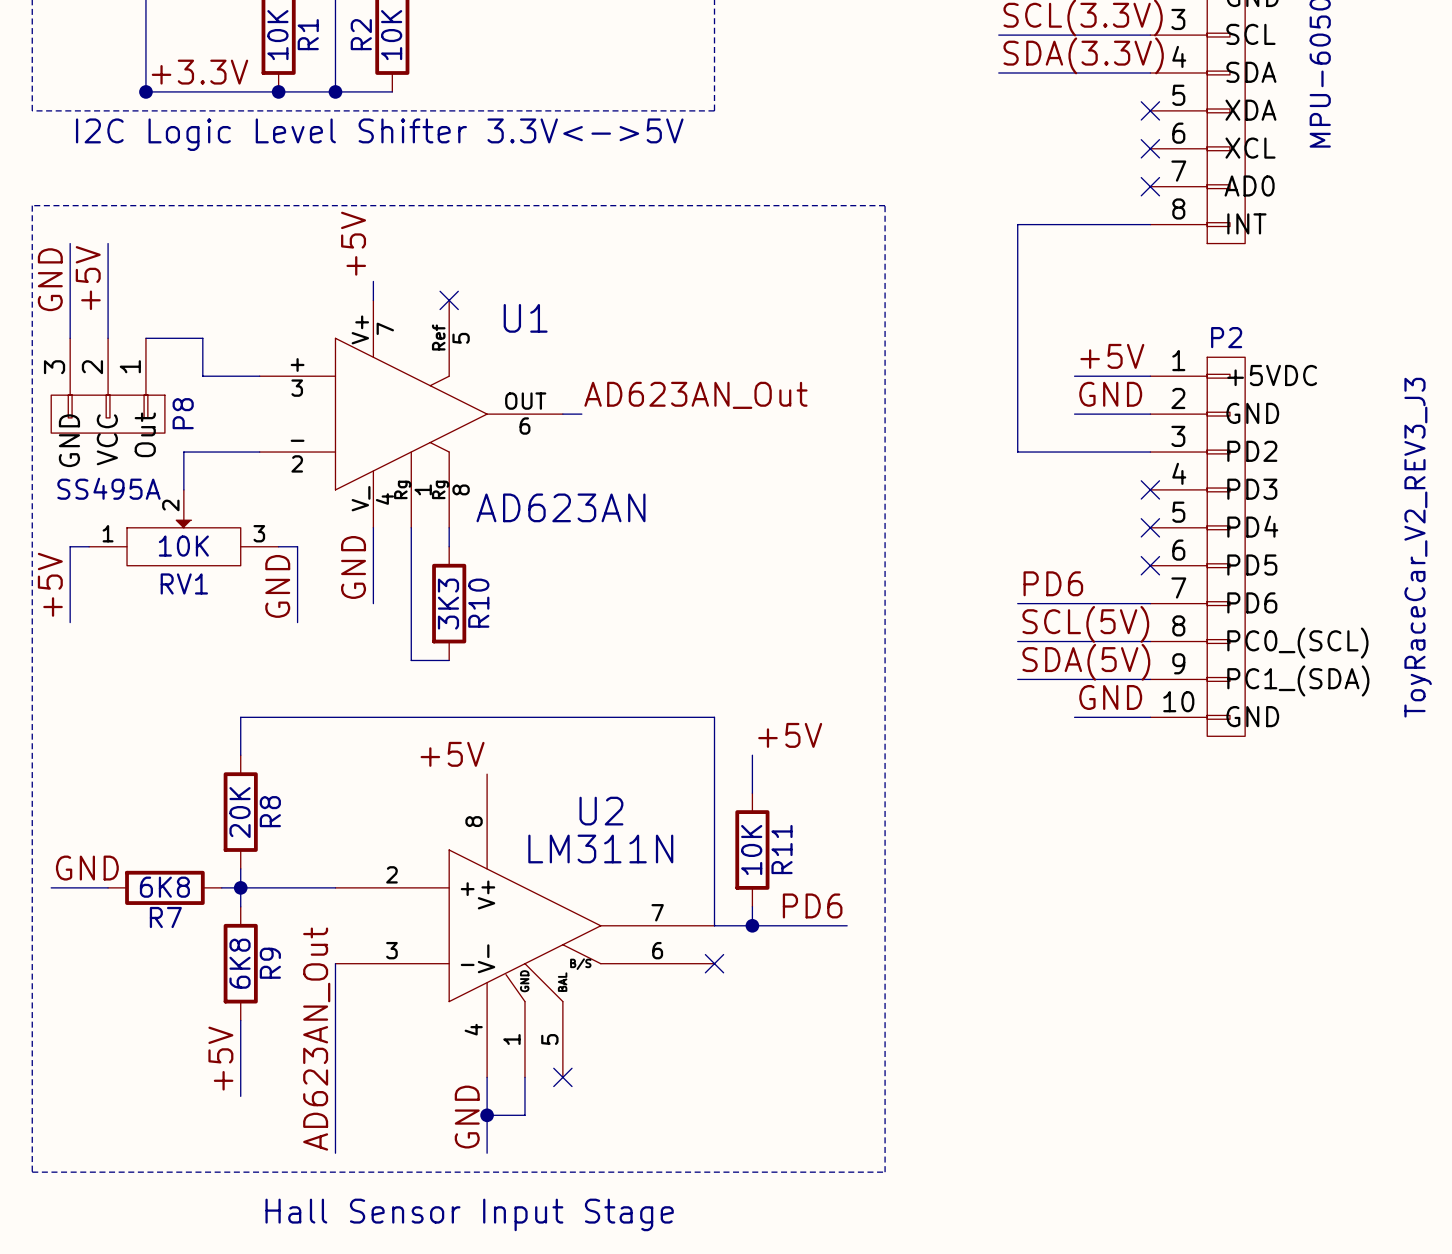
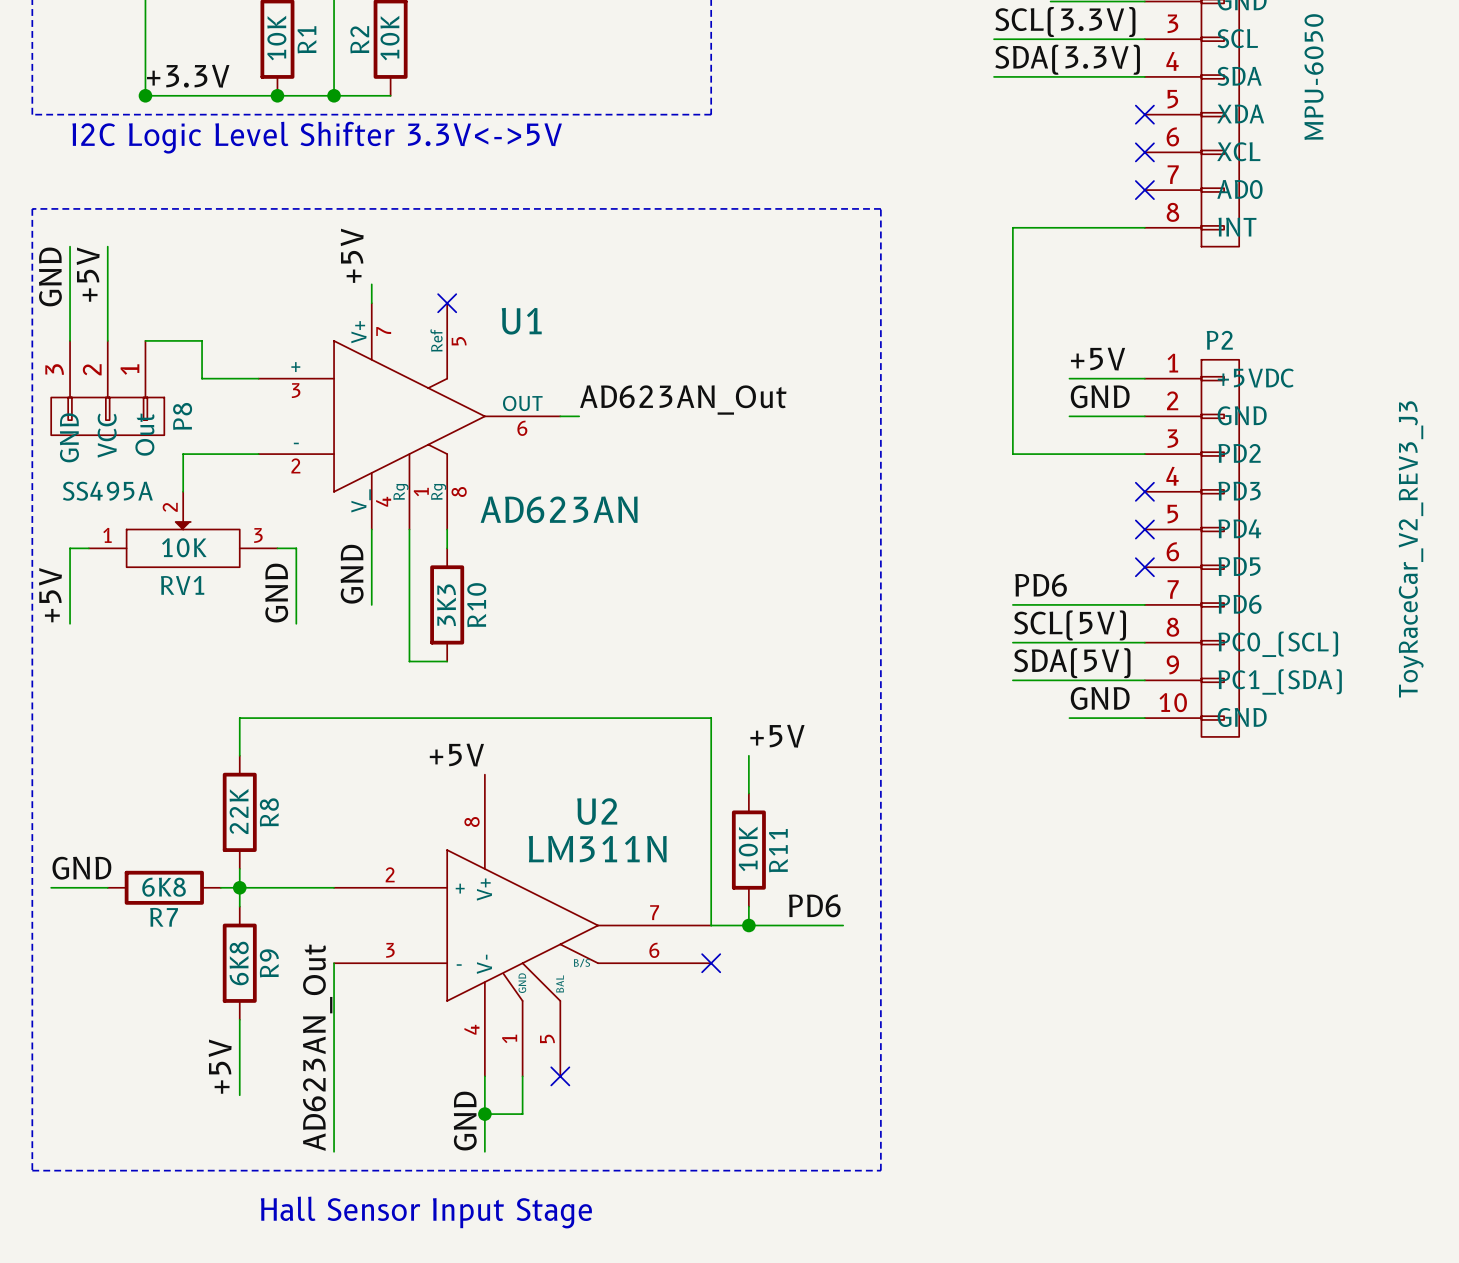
R8 value: 20K (240, 812) -> 22K (239, 811)

